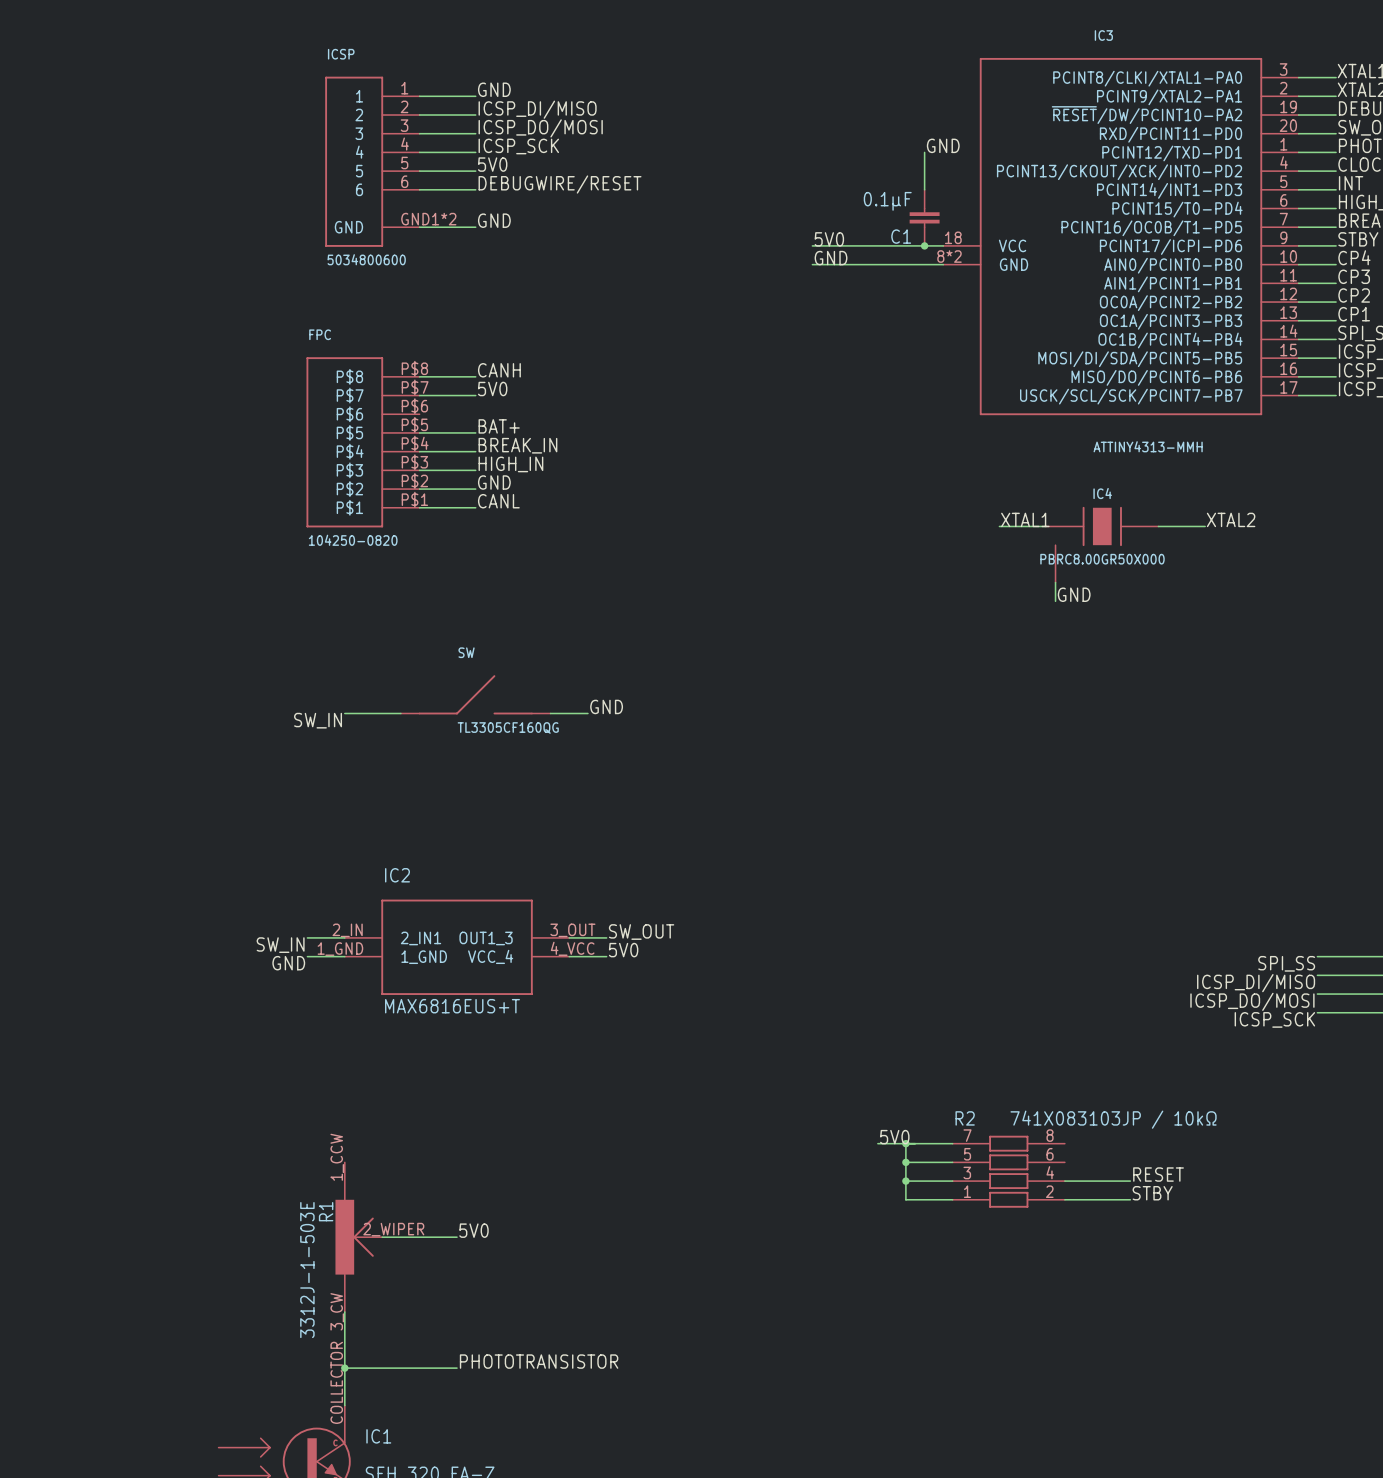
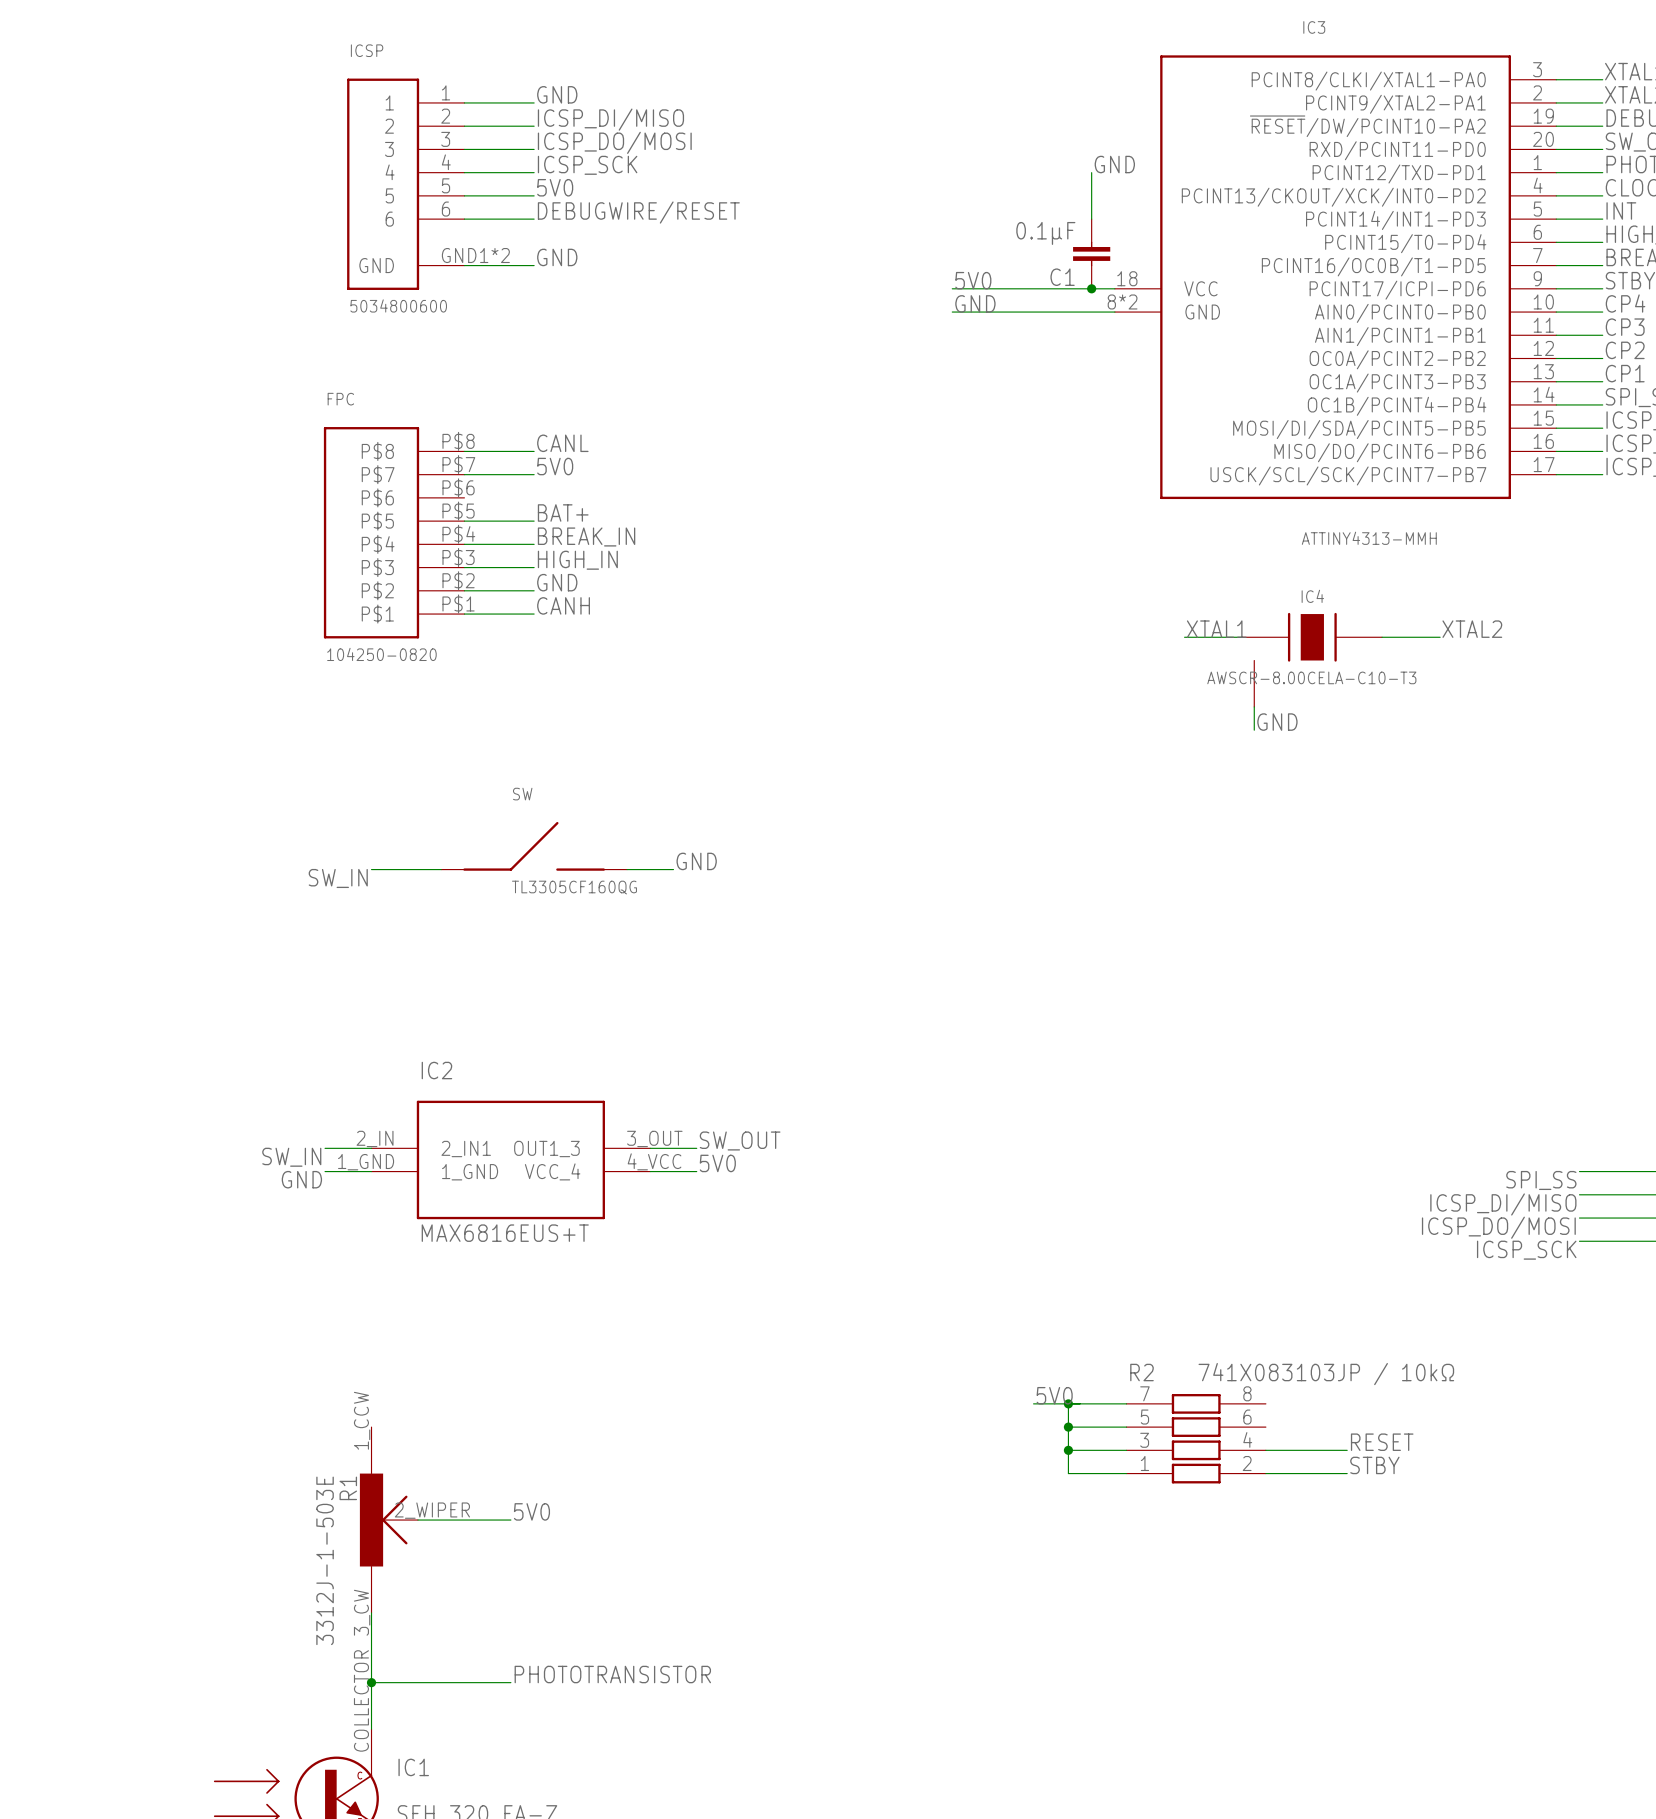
label: CANH (499, 370) -> CANL (562, 443)
label: CANL (498, 501) -> CANH (563, 605)
IC4 value: PBRC8.00GR50X000 (1102, 559) -> AWSCR-8.00CELA-C10-T3 (1311, 677)

